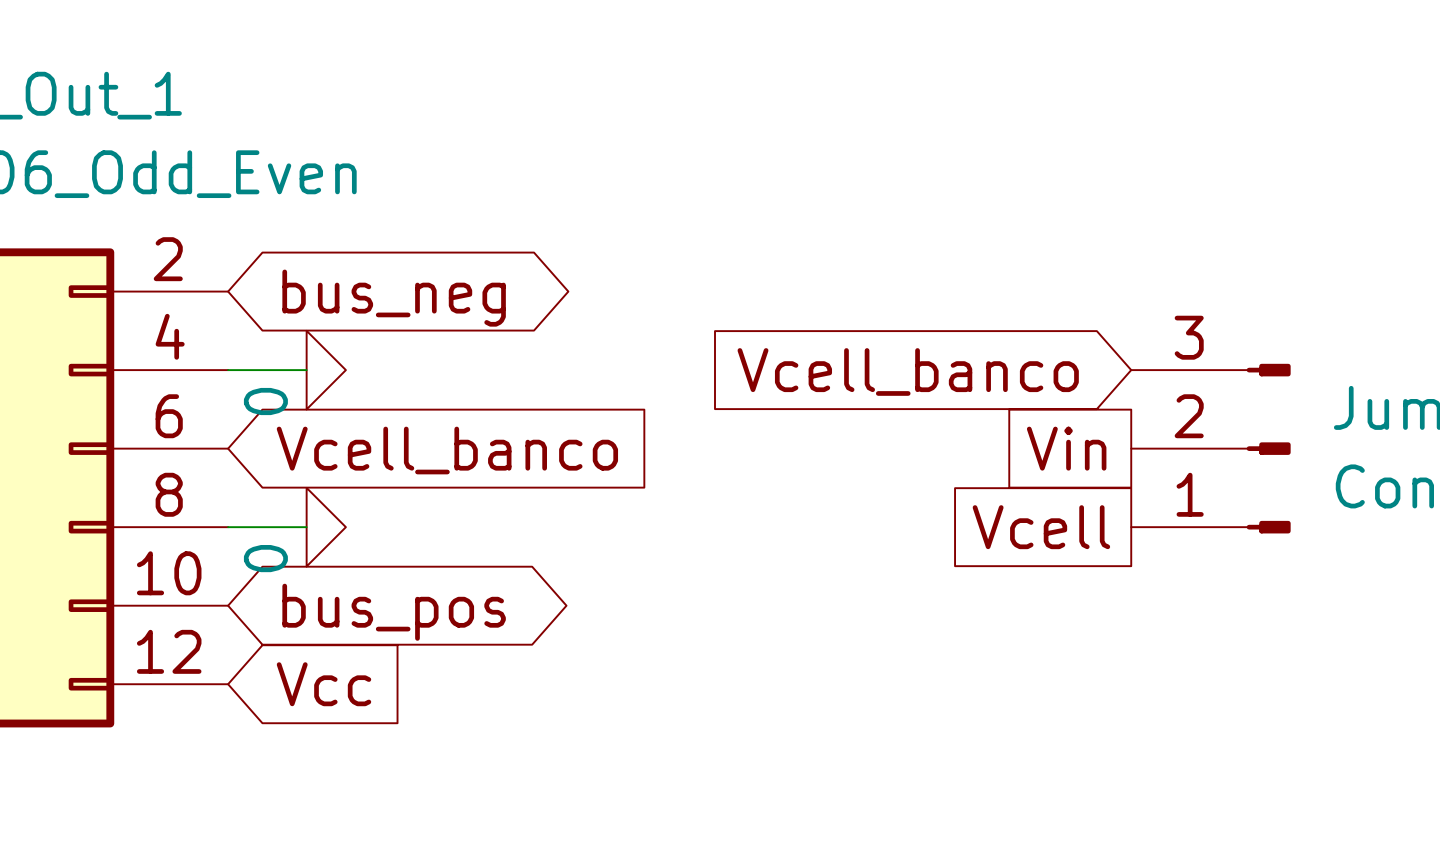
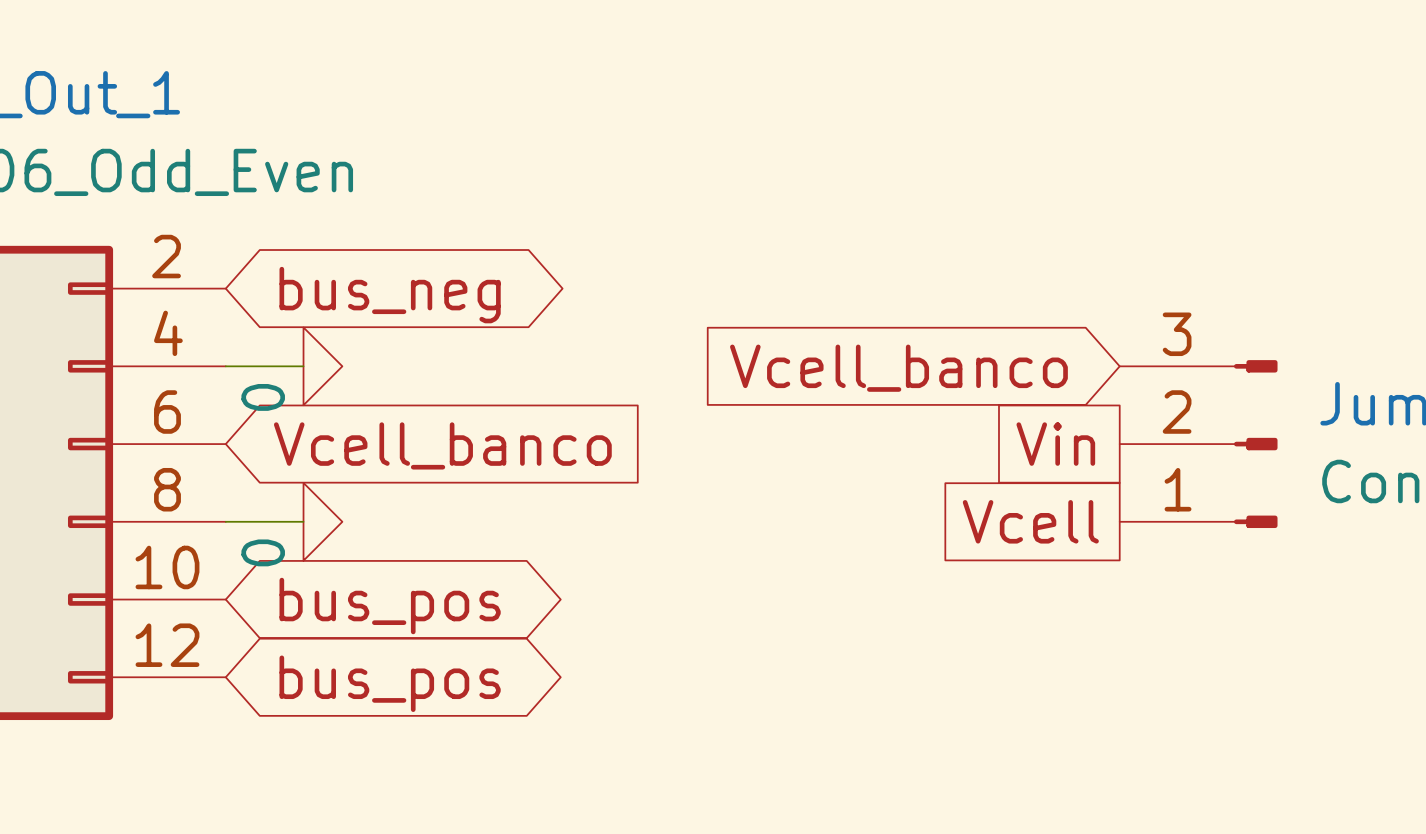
global label shape: input (323, 684) -> bidirectional (390, 683)
global label: Vcc (323, 684) -> bus_pos (390, 683)

